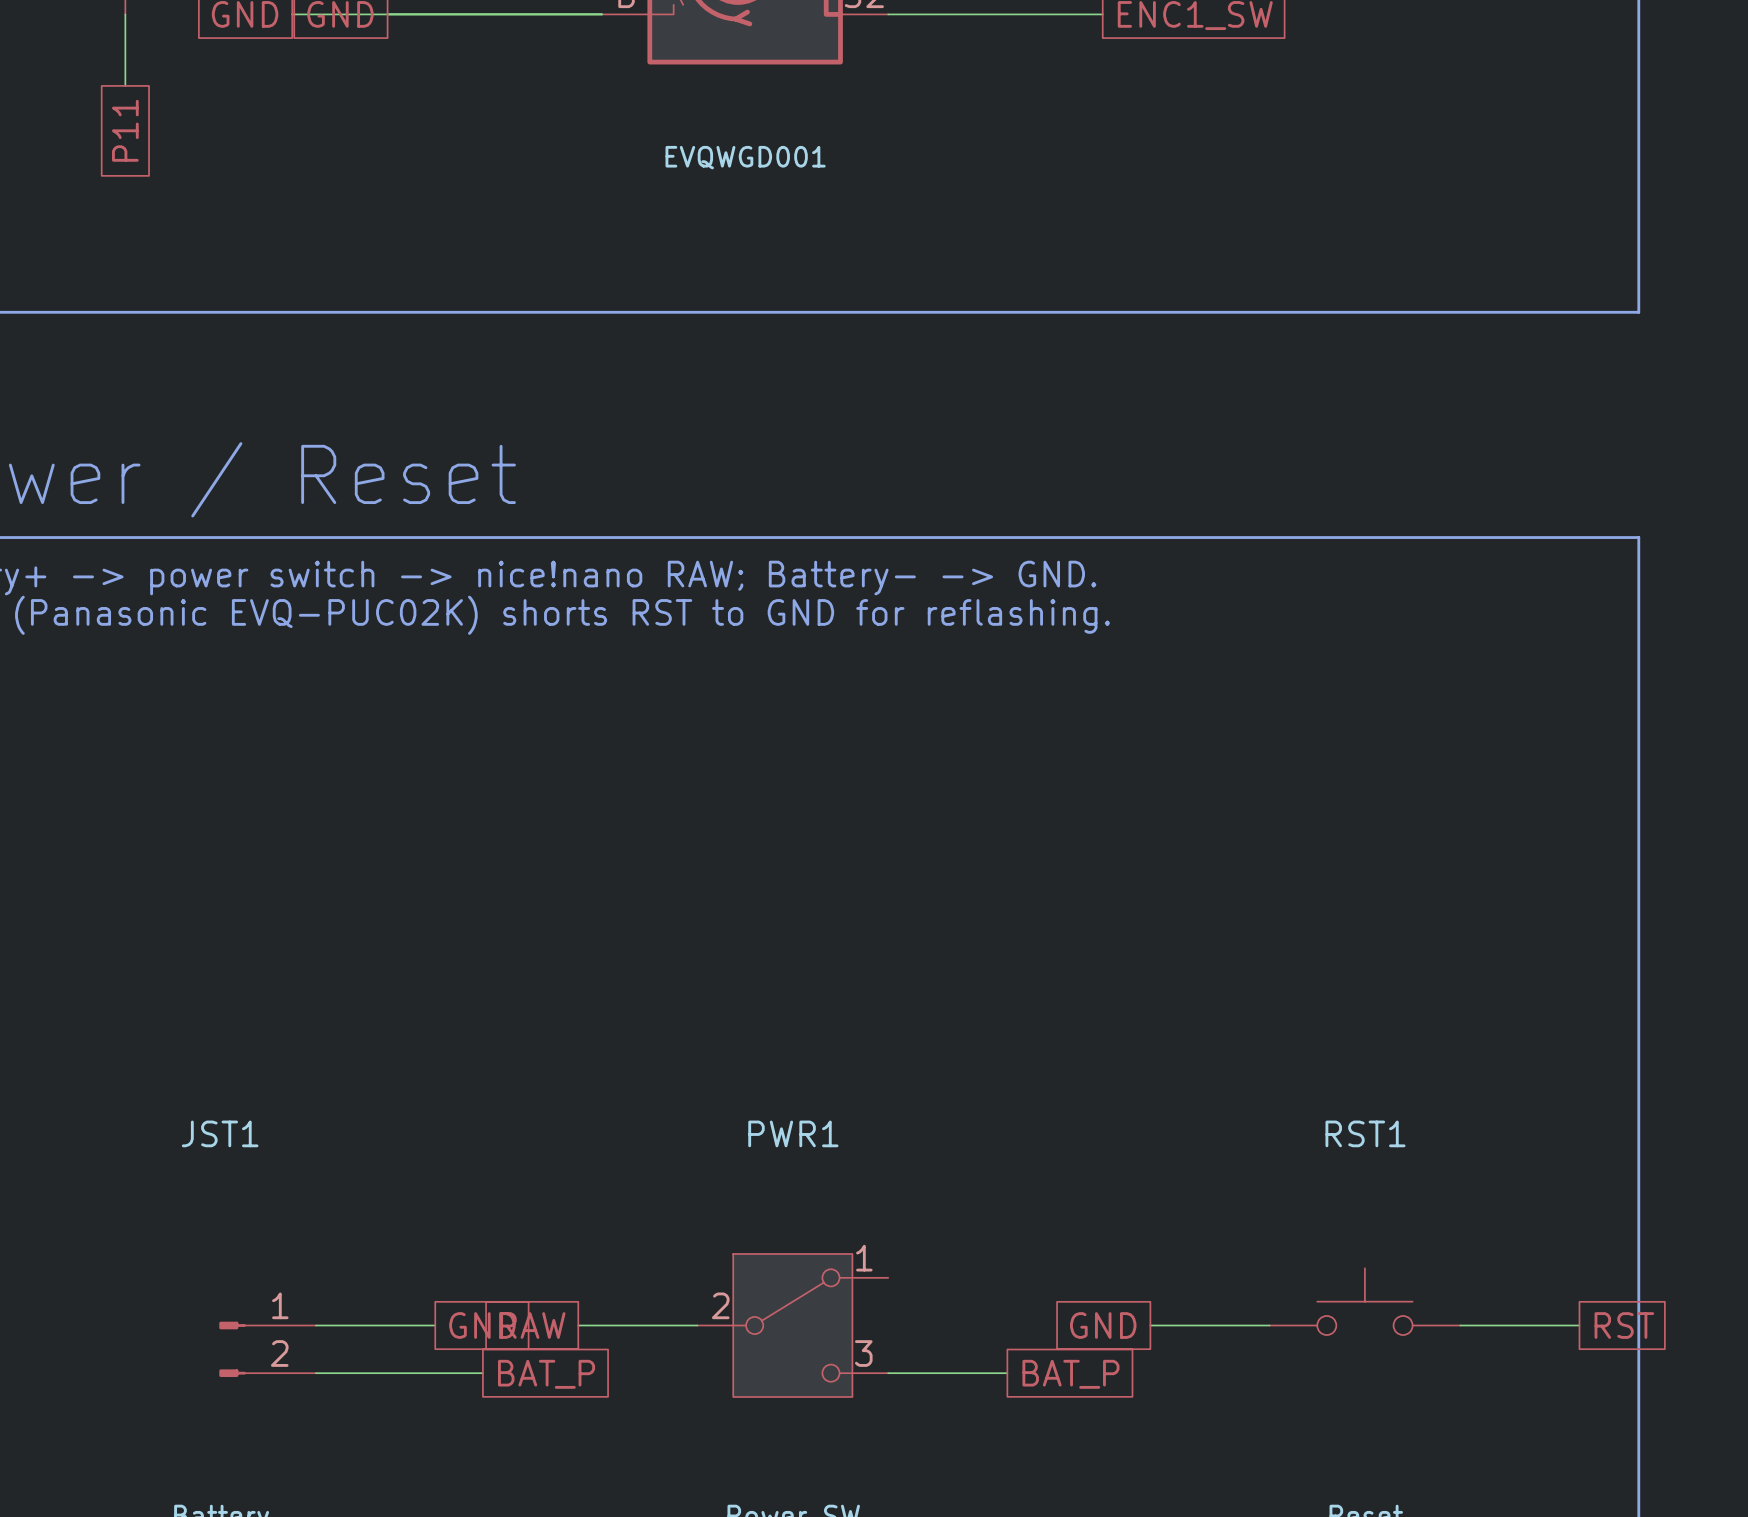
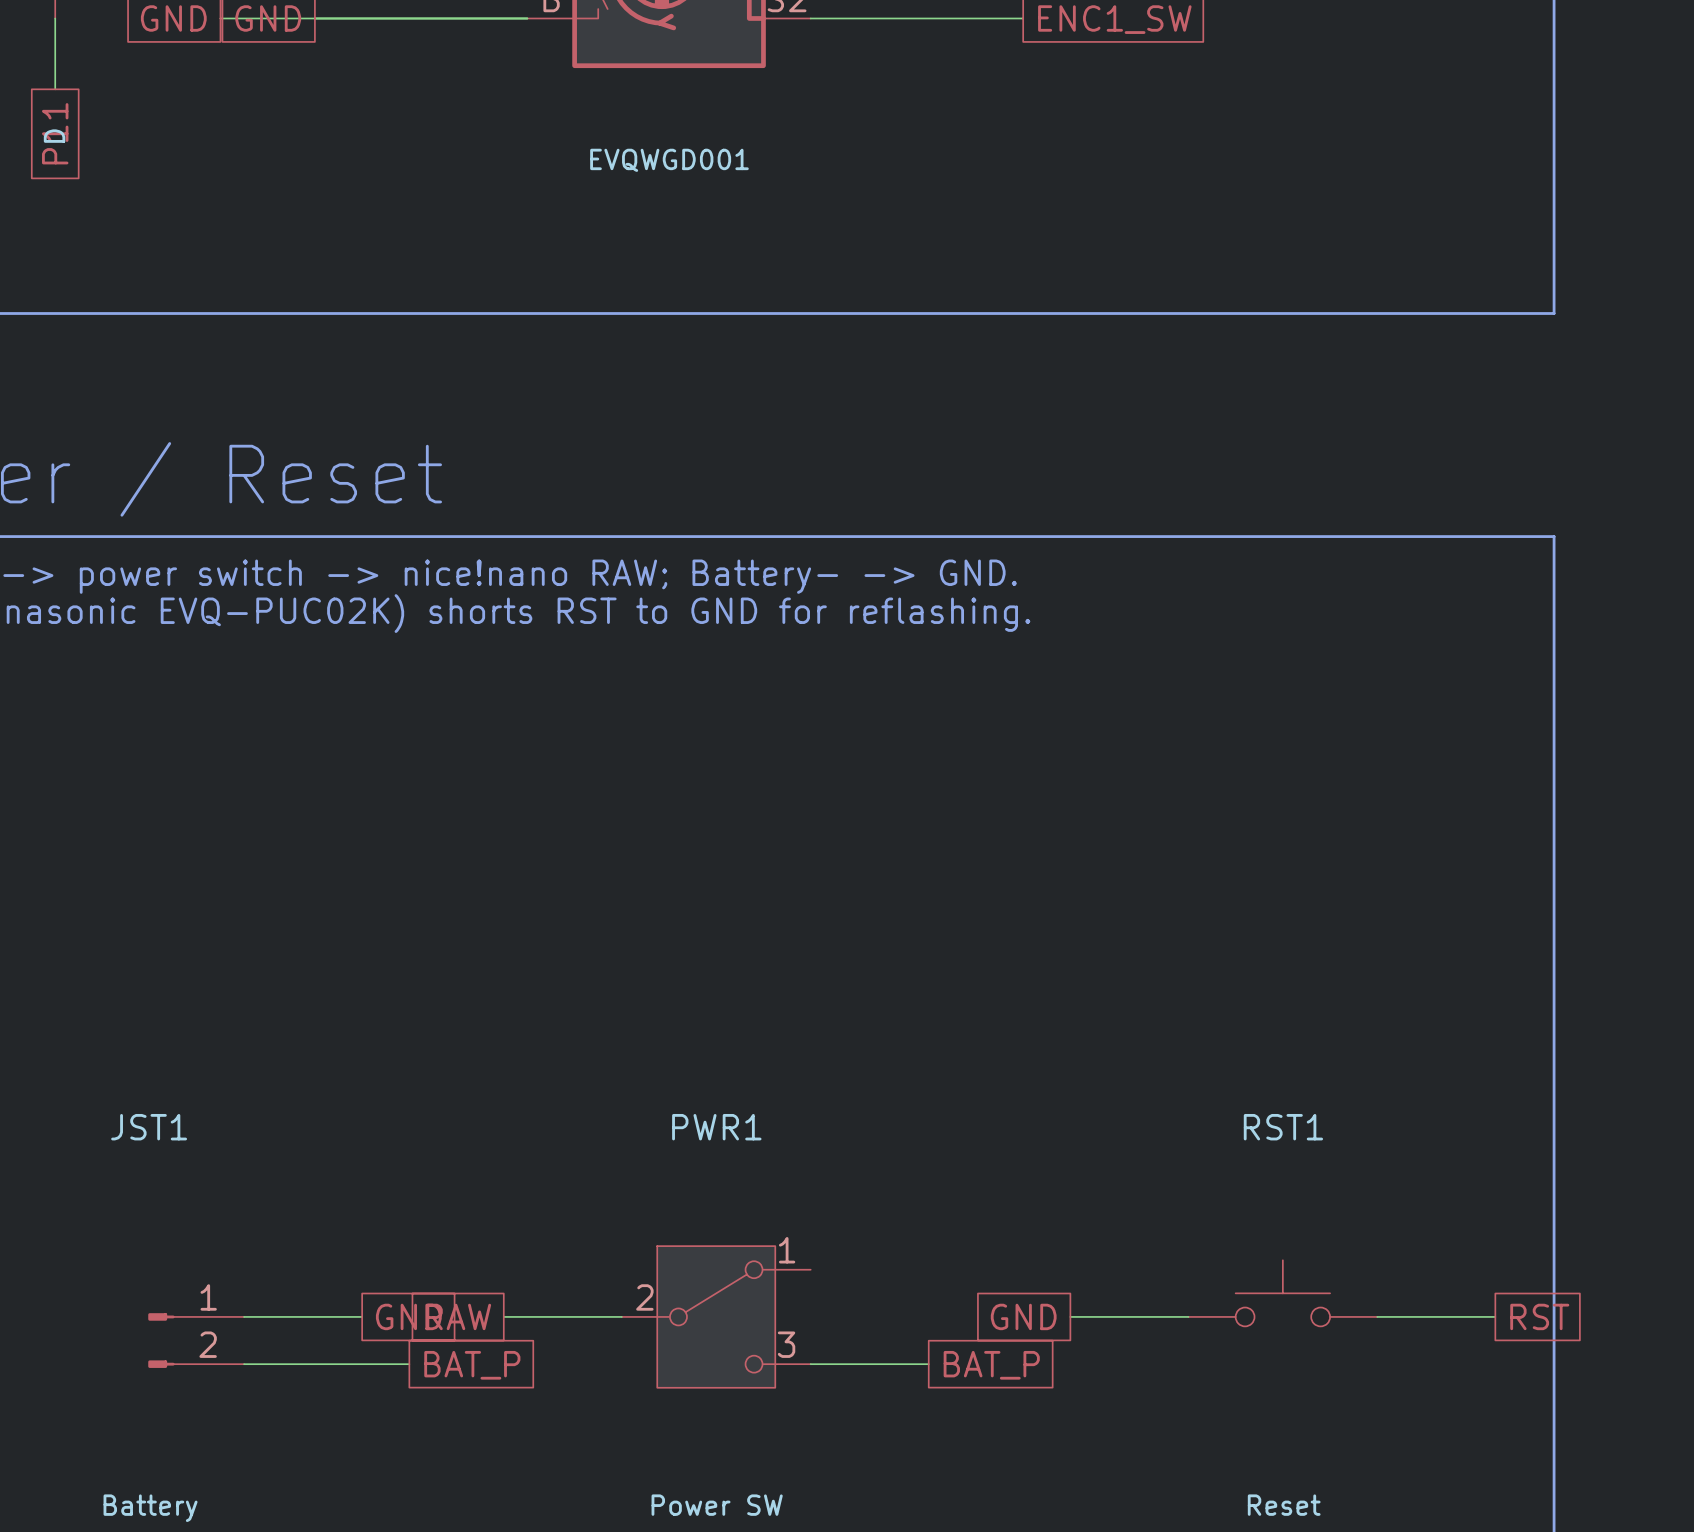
part value: none -> D (54, 136)

